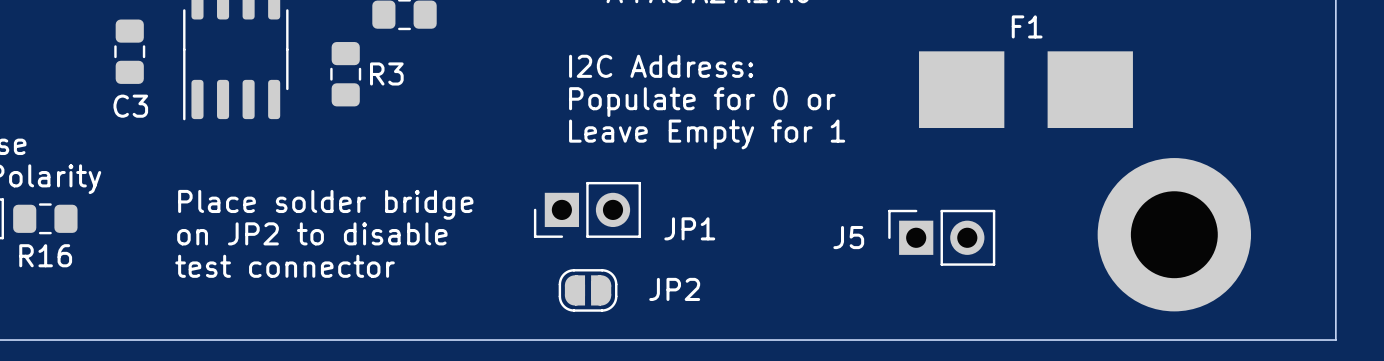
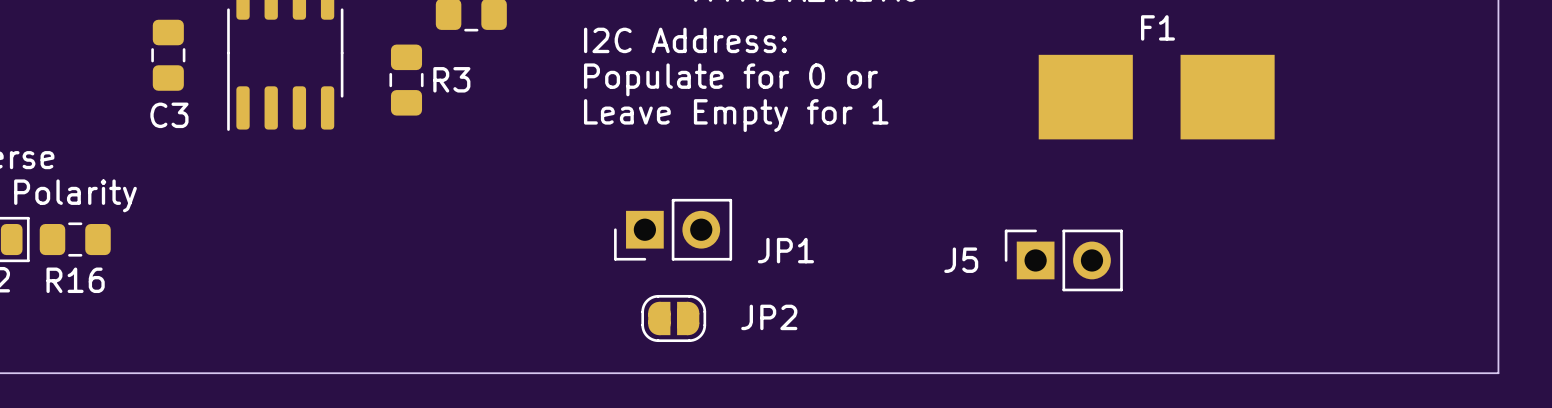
text position: I2C Address: (661, 66) -> I2C Address: (685, 40)
text position: Populate for 0 or (702, 102) -> Populate for 0 or (730, 79)
text position: Leave Empty for 1 (707, 134) -> Leave Empty for 1 (736, 115)
text: Place solder bridge (325, 204) -> none
text: on JP2 to disable (312, 233) -> none
part: (1174, 234) -> none
text: test connector (285, 266) -> none

